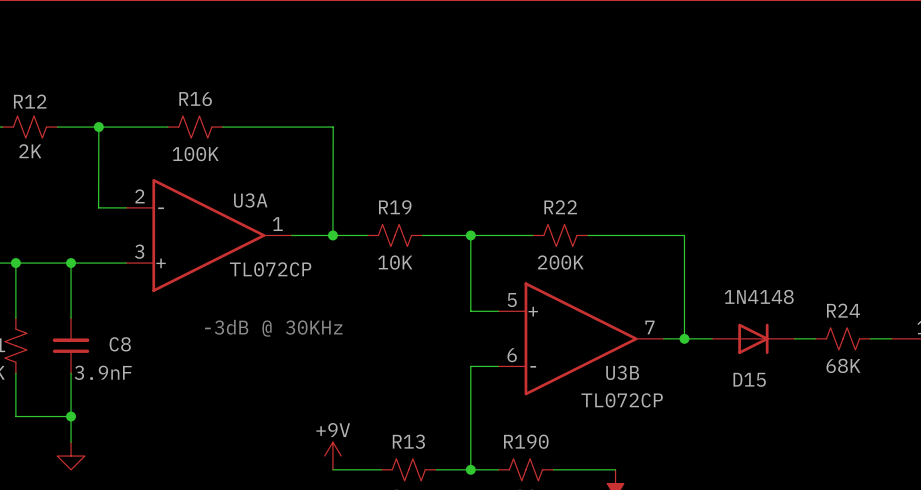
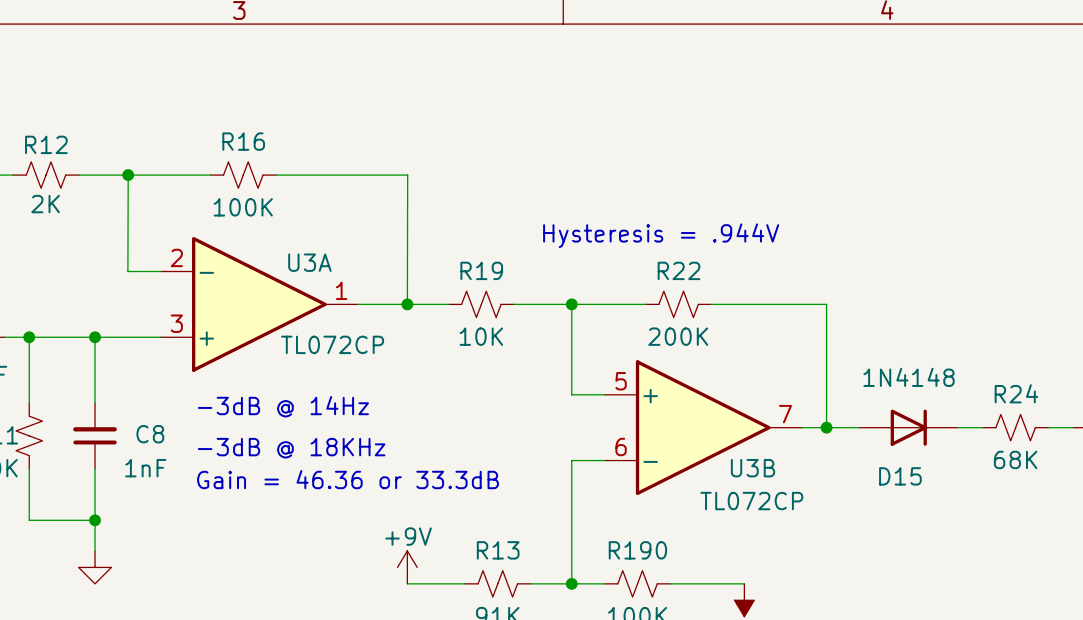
text: none -> Hysteresis = .944V (661, 235)
text: none -> -3dB @ 14Hz (283, 406)
text: -3dB @ 30KHz (273, 328) -> none
text: none -> -3dB @ 18KHz (291, 448)
C8 value: 3.9nF (103, 372) -> 1nF (145, 468)
text: none -> Gain = 46.36 or 33.3dB (348, 479)

